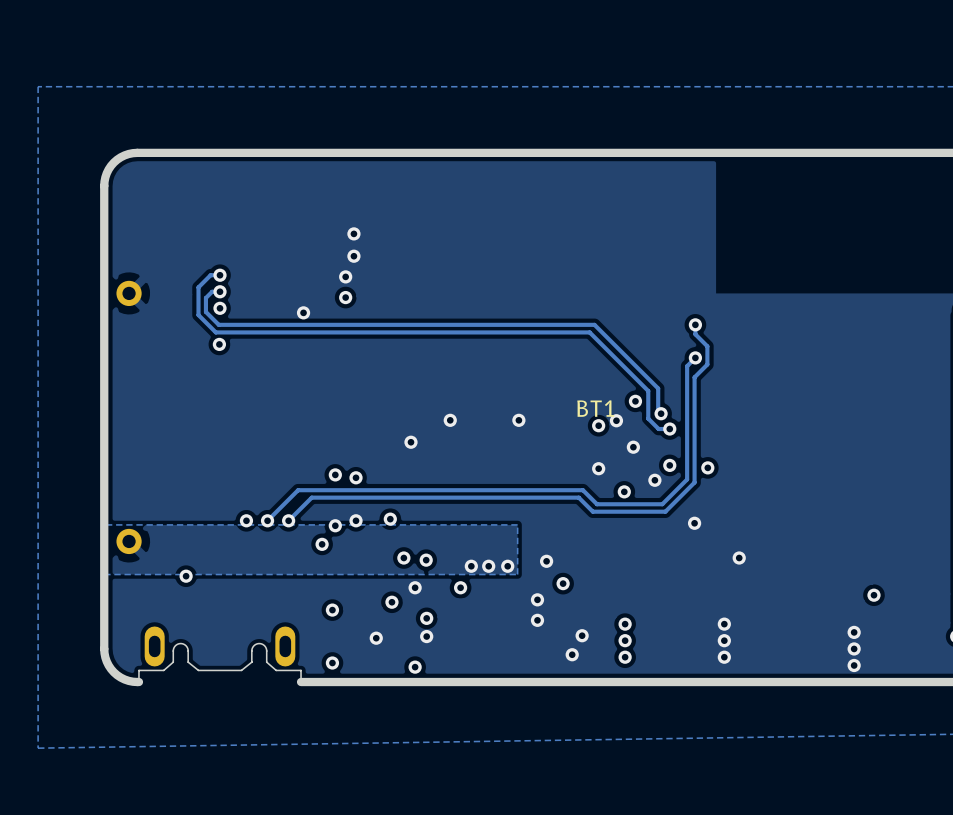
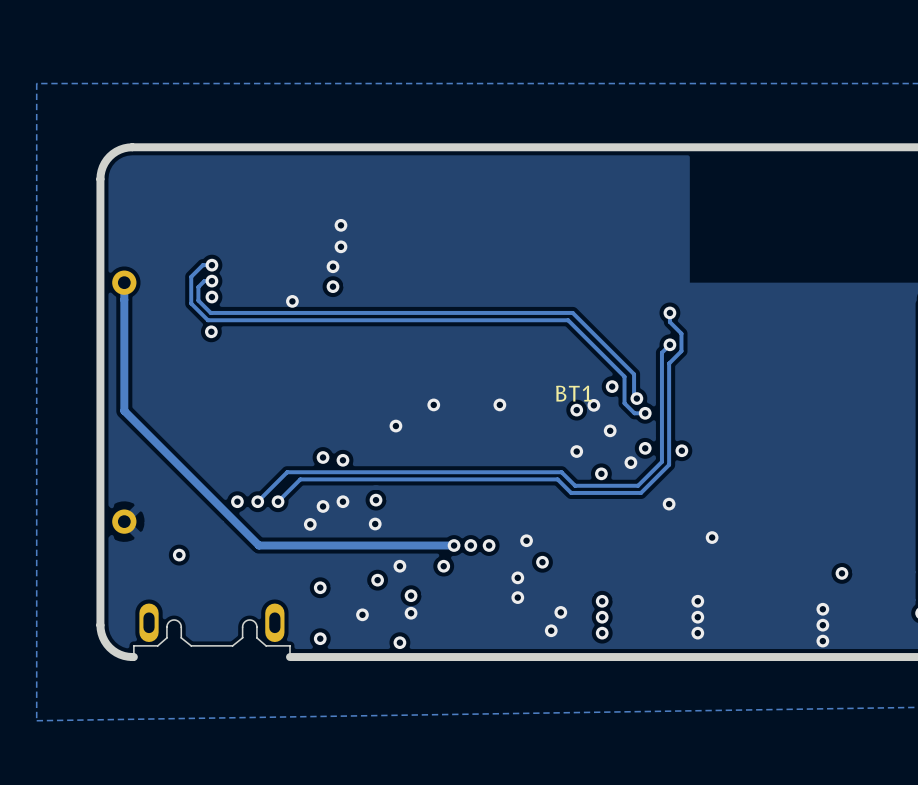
track: none -> (124, 282) (124, 410) (258, 545) (454, 545)
zone outline: (517, 524) (517, 574) (104, 574) (104, 524) (517, 524) -> none
via: none -> (375, 524)
via: (403, 558) -> none
via: (426, 560) -> none

